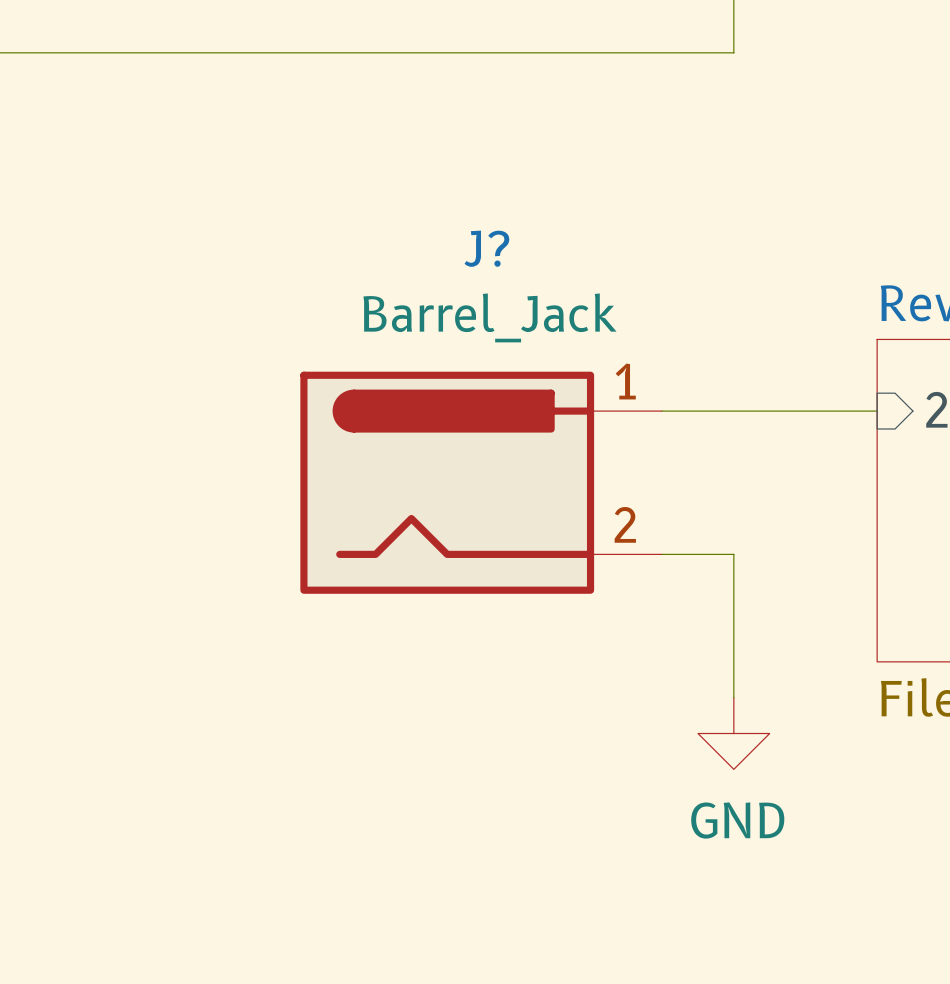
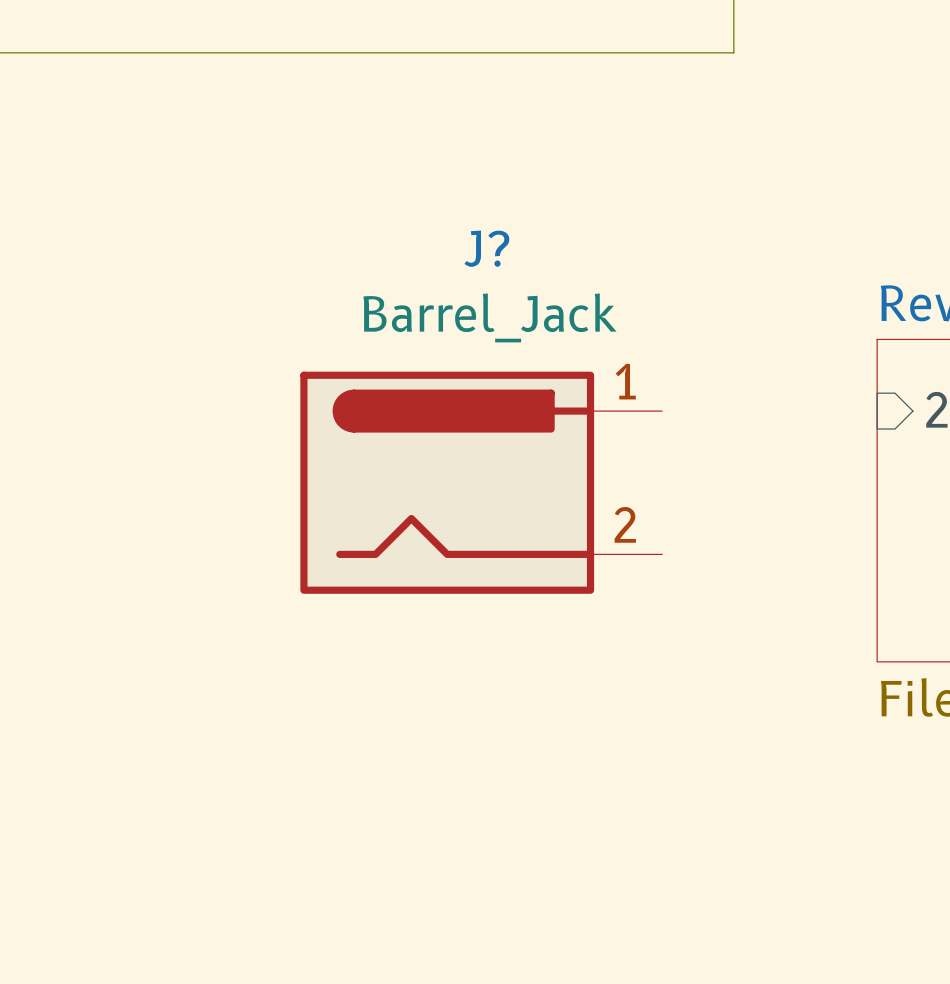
wire: (662, 411) (877, 411) -> none
wire: (662, 554) (733, 554) (733, 697) -> none
power symbol: GND (733, 733) -> none

